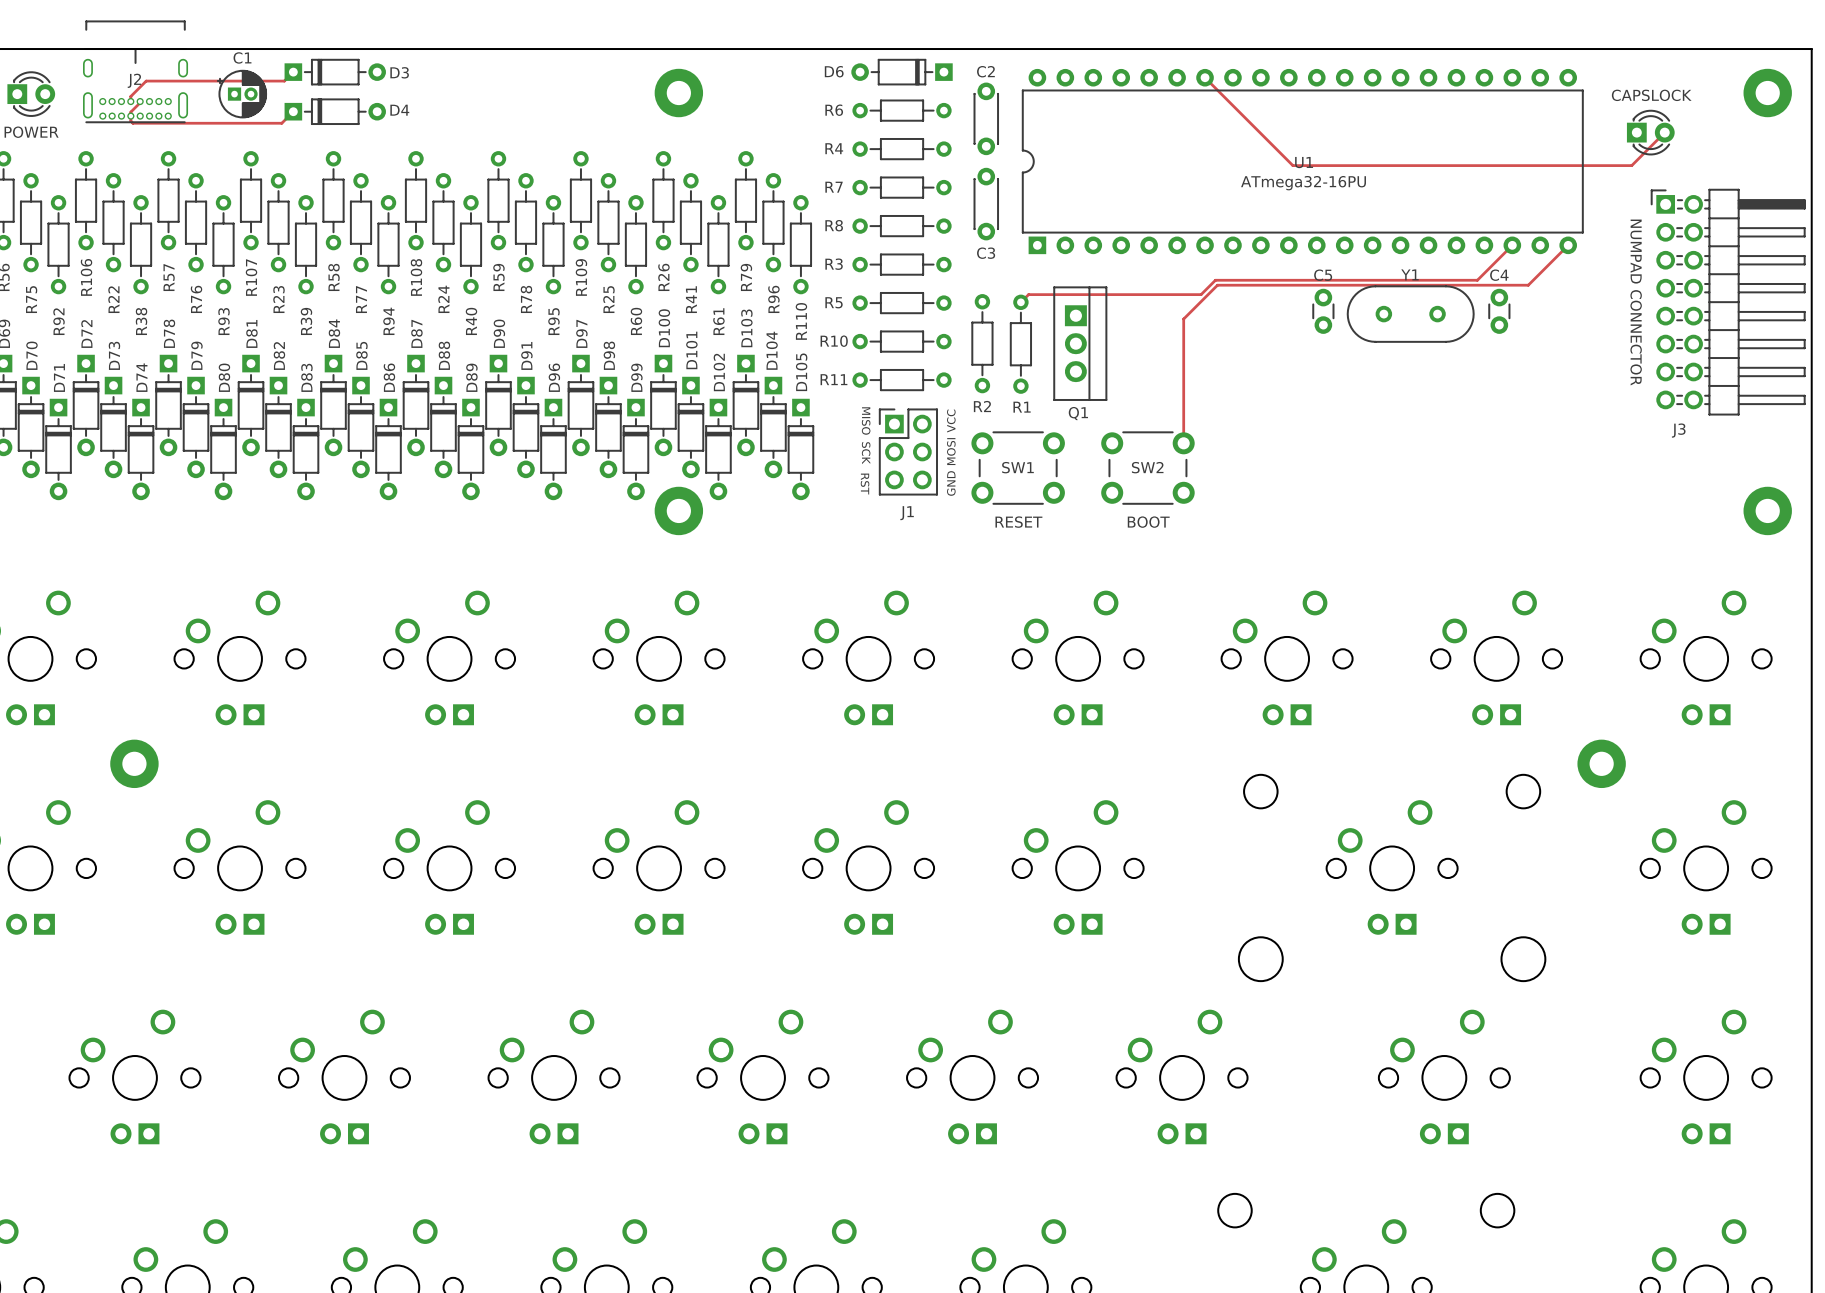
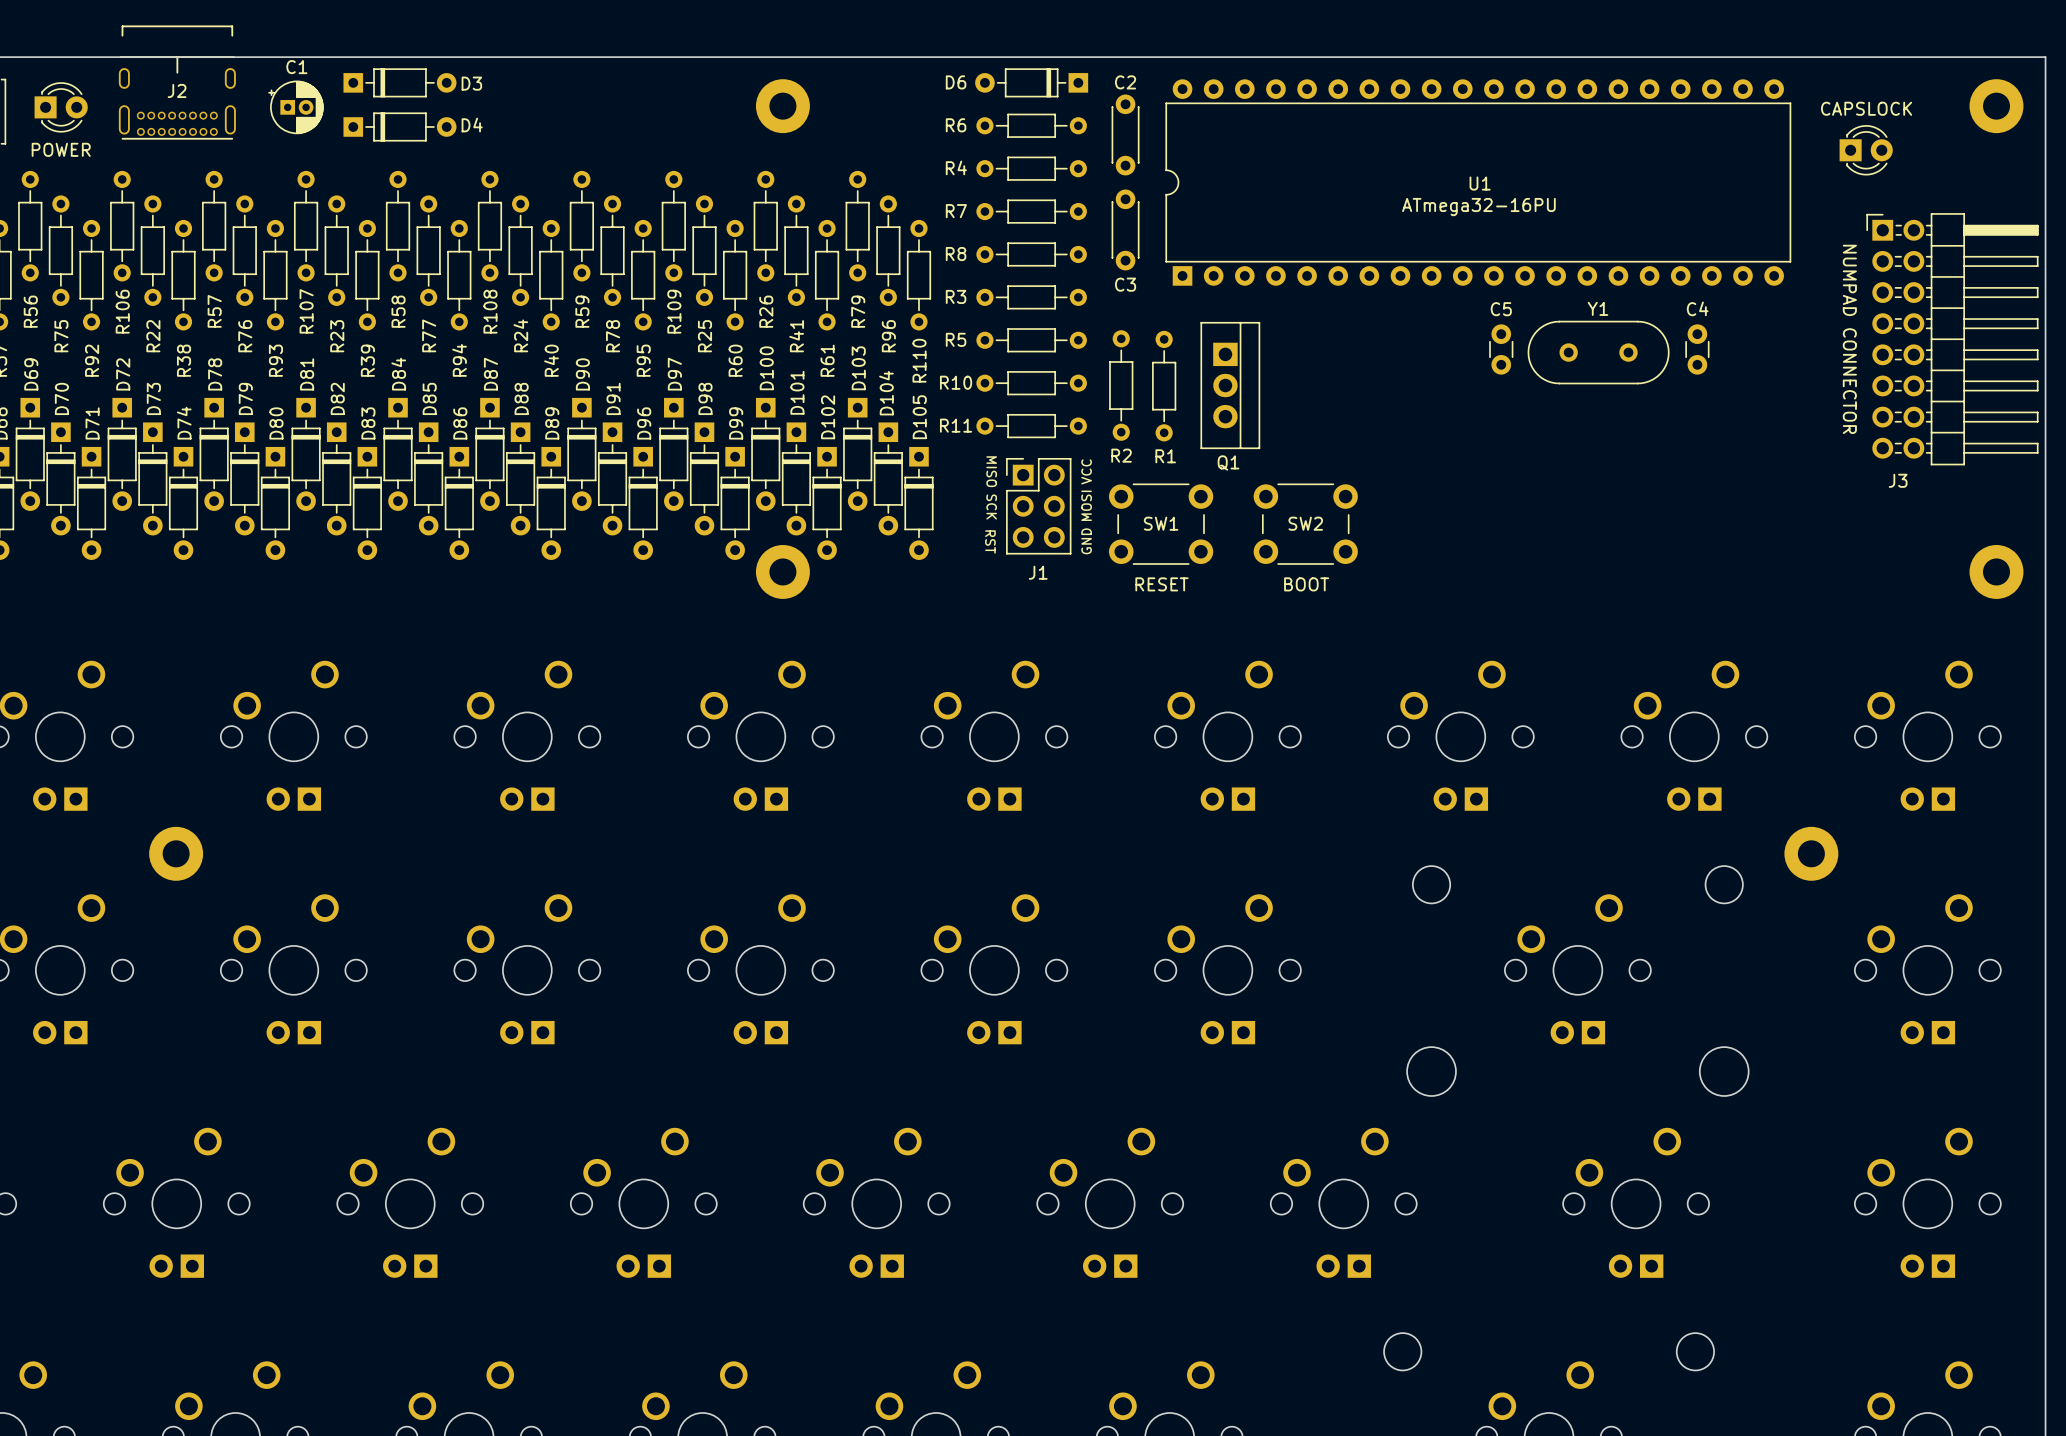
track: (293, 72) (284, 81) (146, 81) (130, 96) (130, 101) -> none
track: (1205, 77) (1292, 165) (1631, 165) (1664, 132) -> none
track: (140, 101) (130, 112) (130, 121) (132, 123) (281, 123) (293, 111) -> none
track: (1512, 245) (1477, 280) (1215, 280) (1201, 294) (1028, 294) (1020, 302) -> none
track: (1568, 245) (1528, 285) (1217, 285) (1183, 319) (1183, 443) -> none

